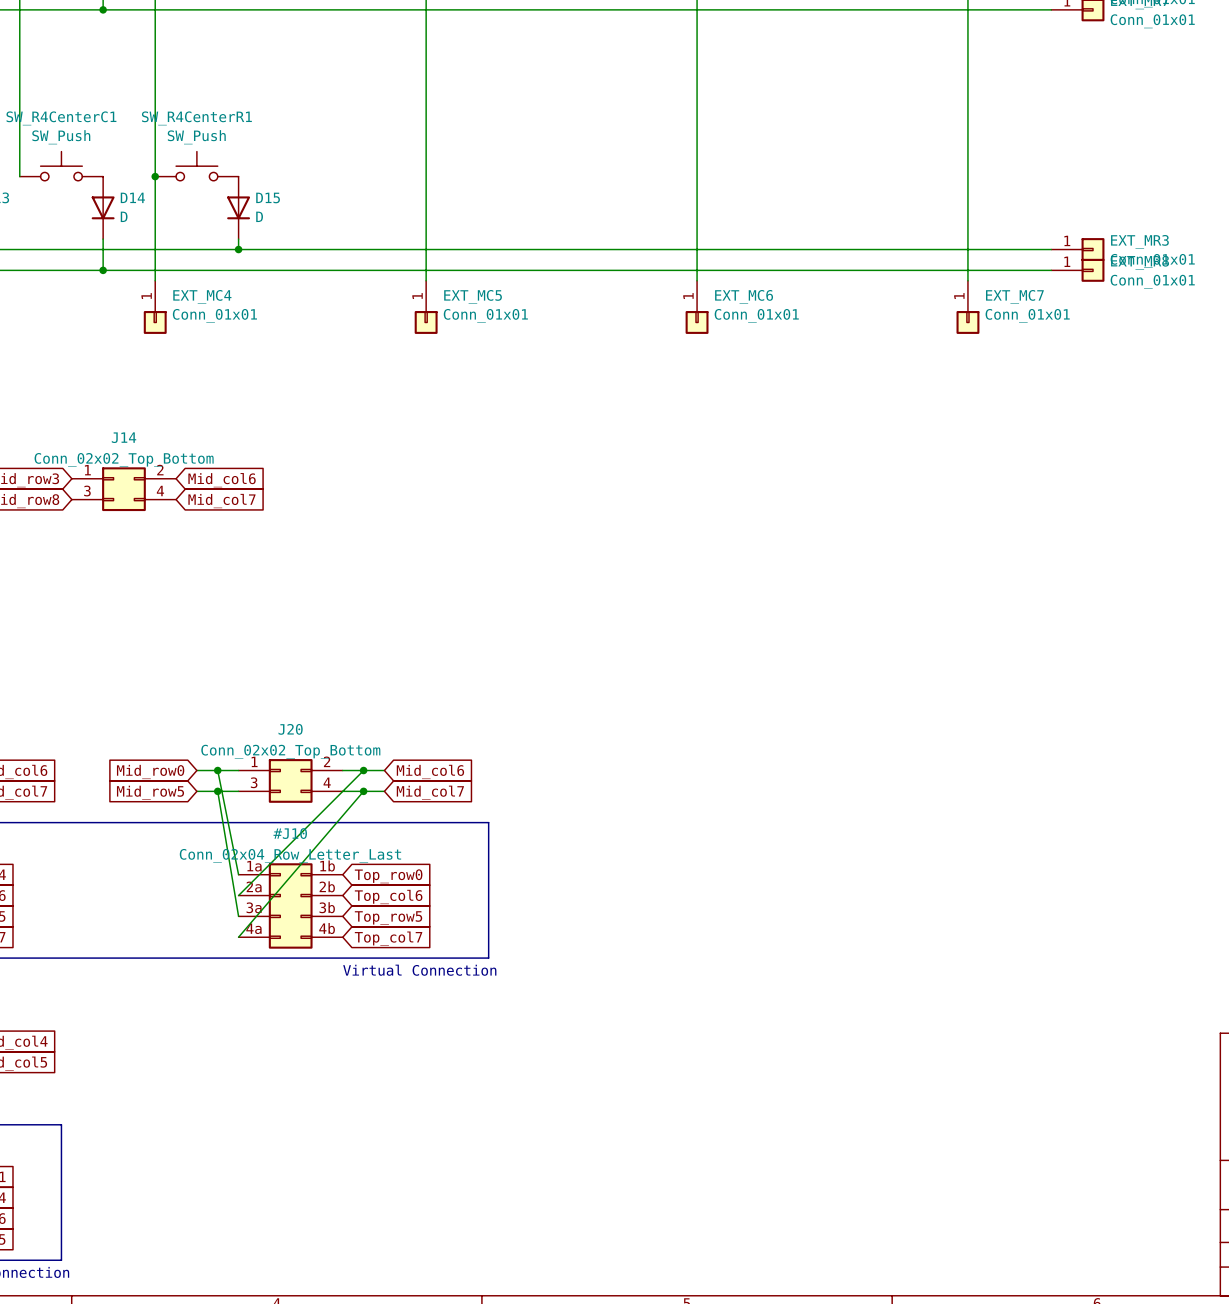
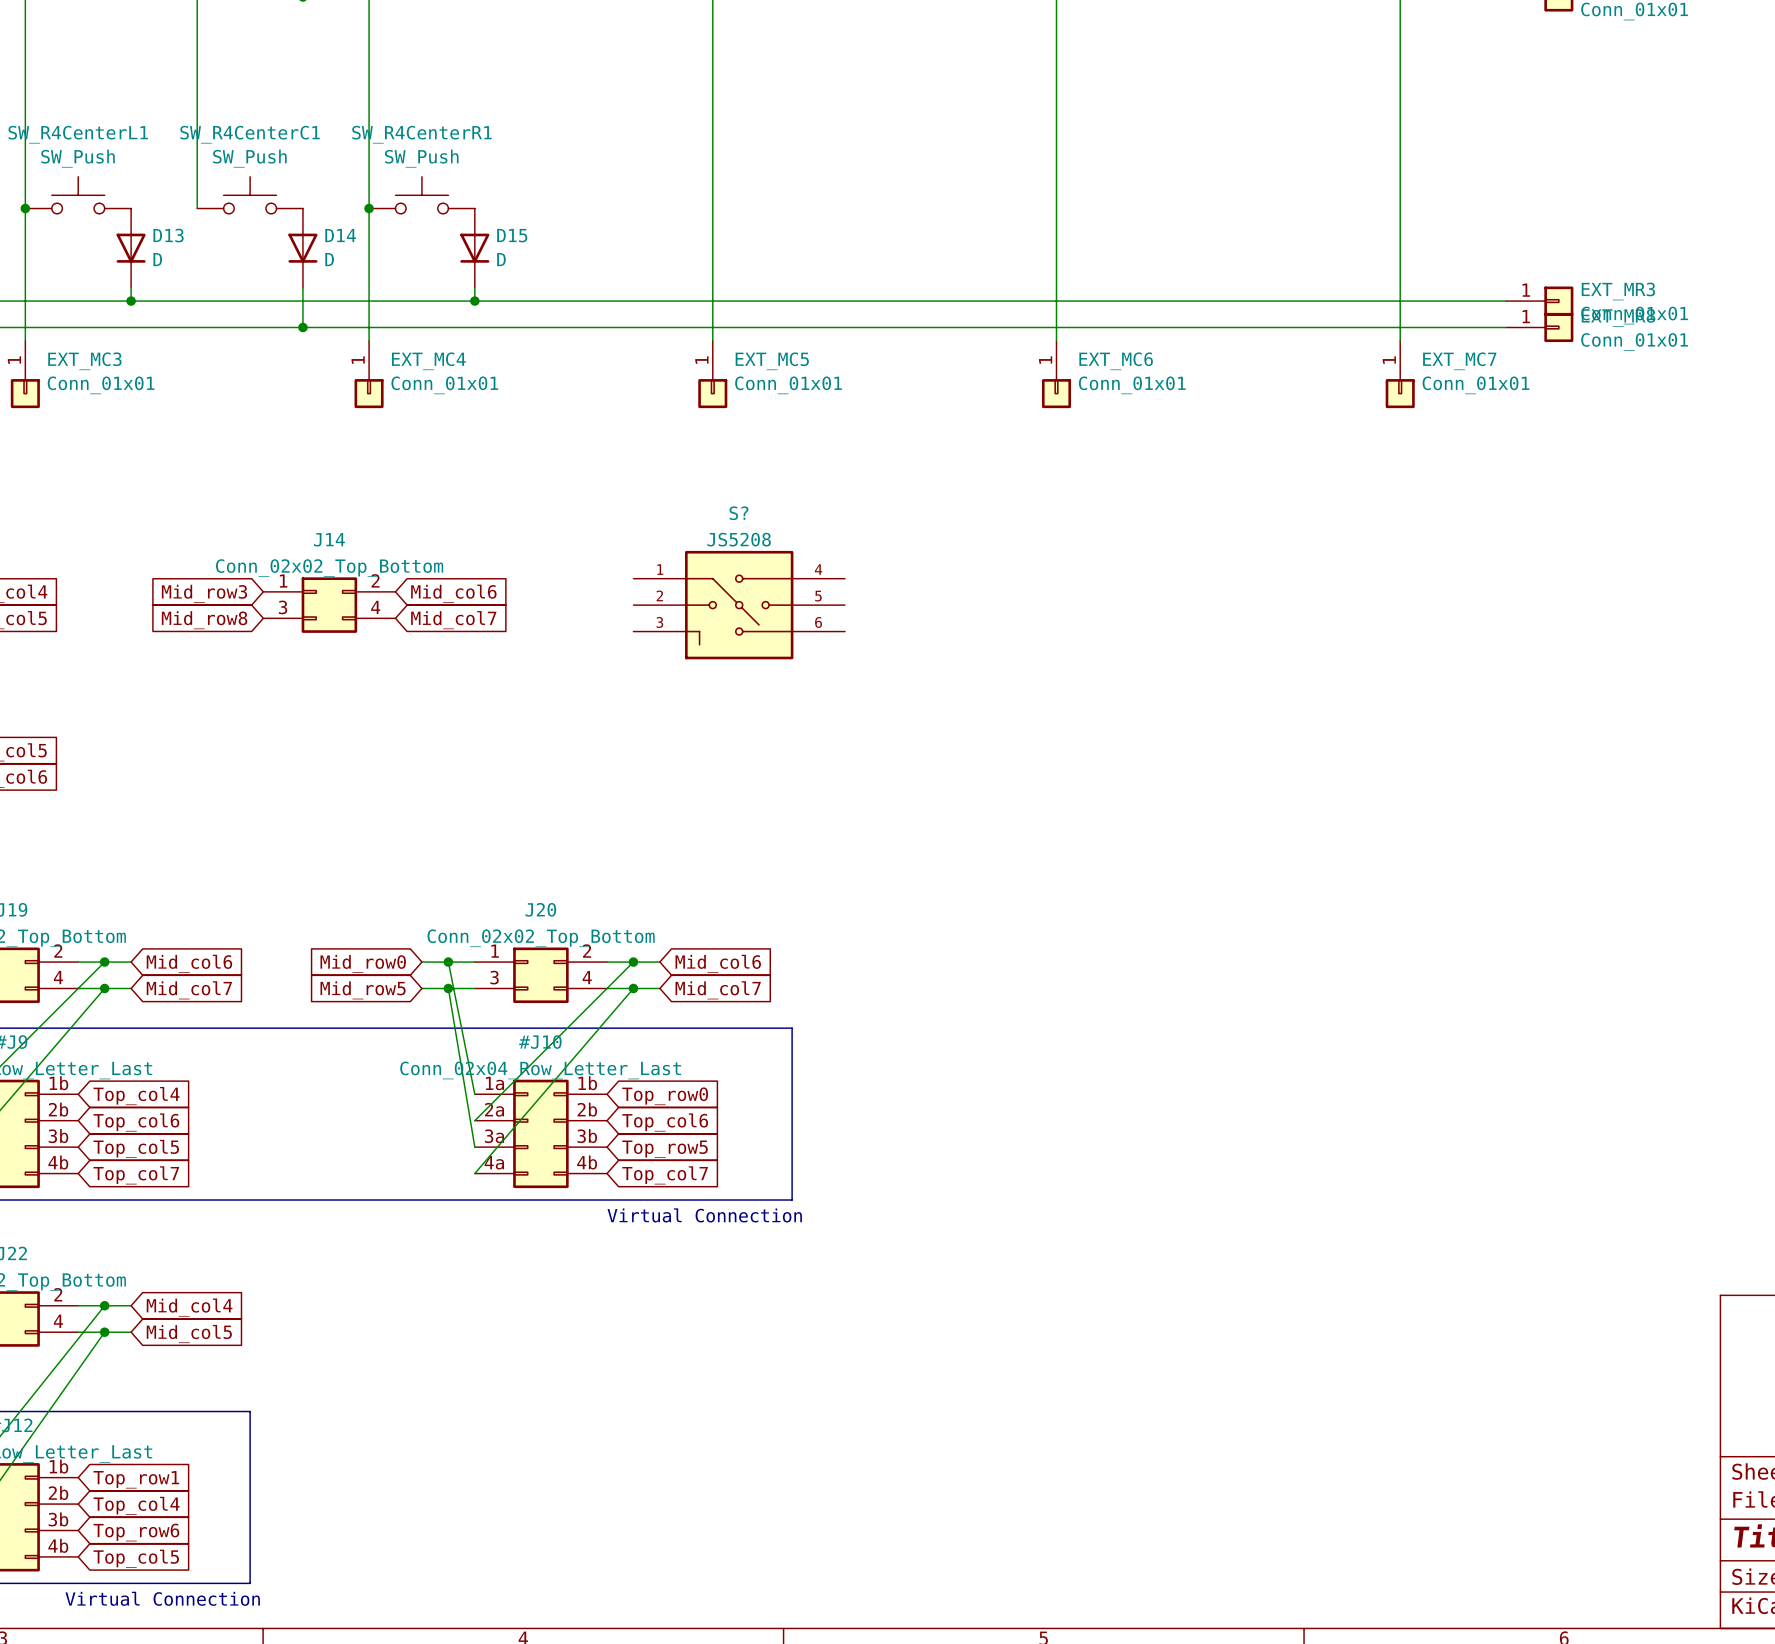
S?: none -> JS5208 (739, 605)

